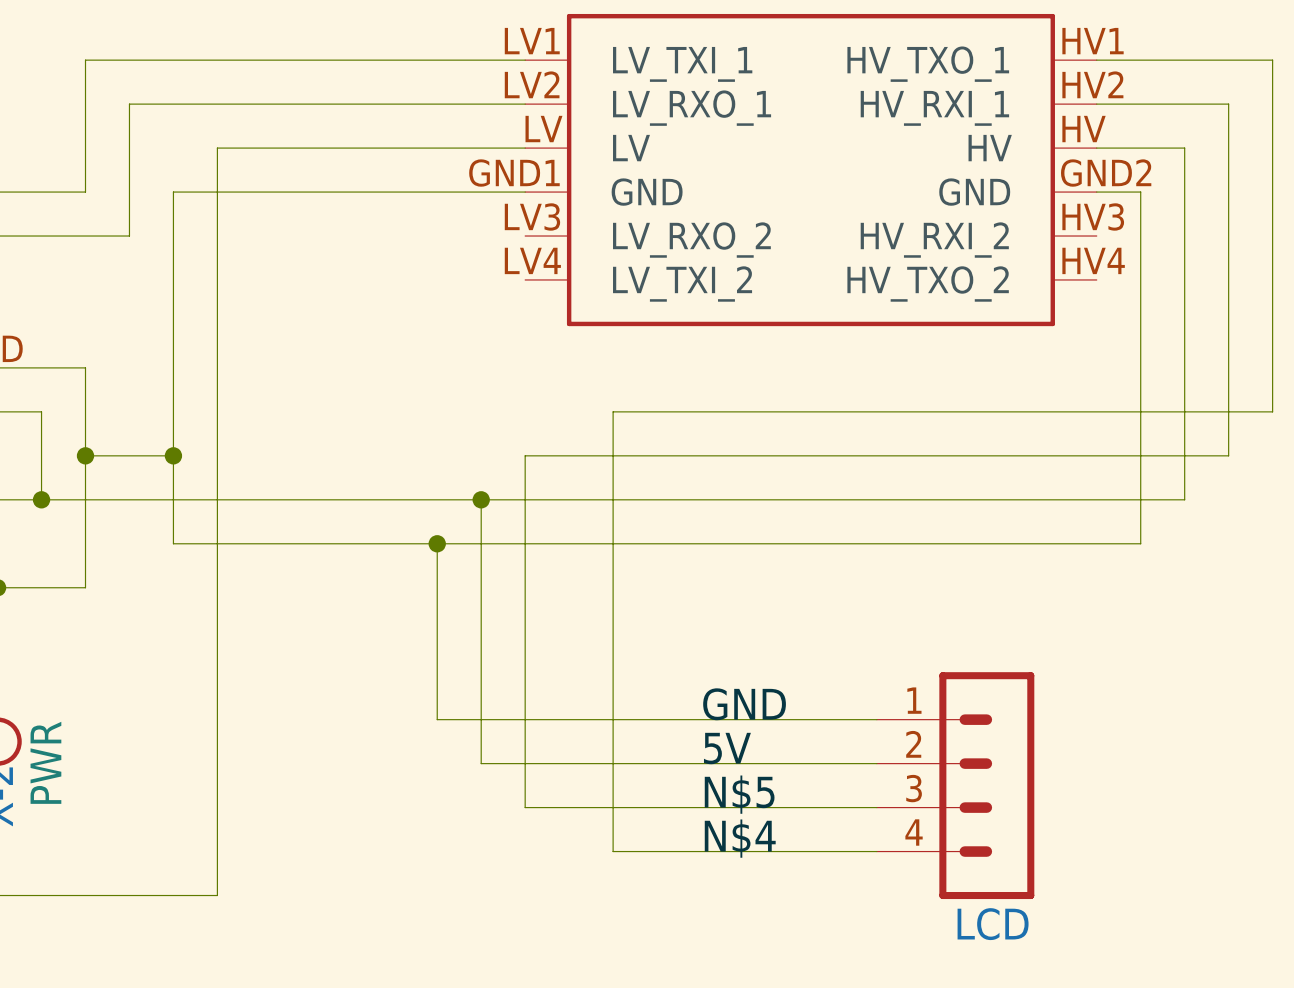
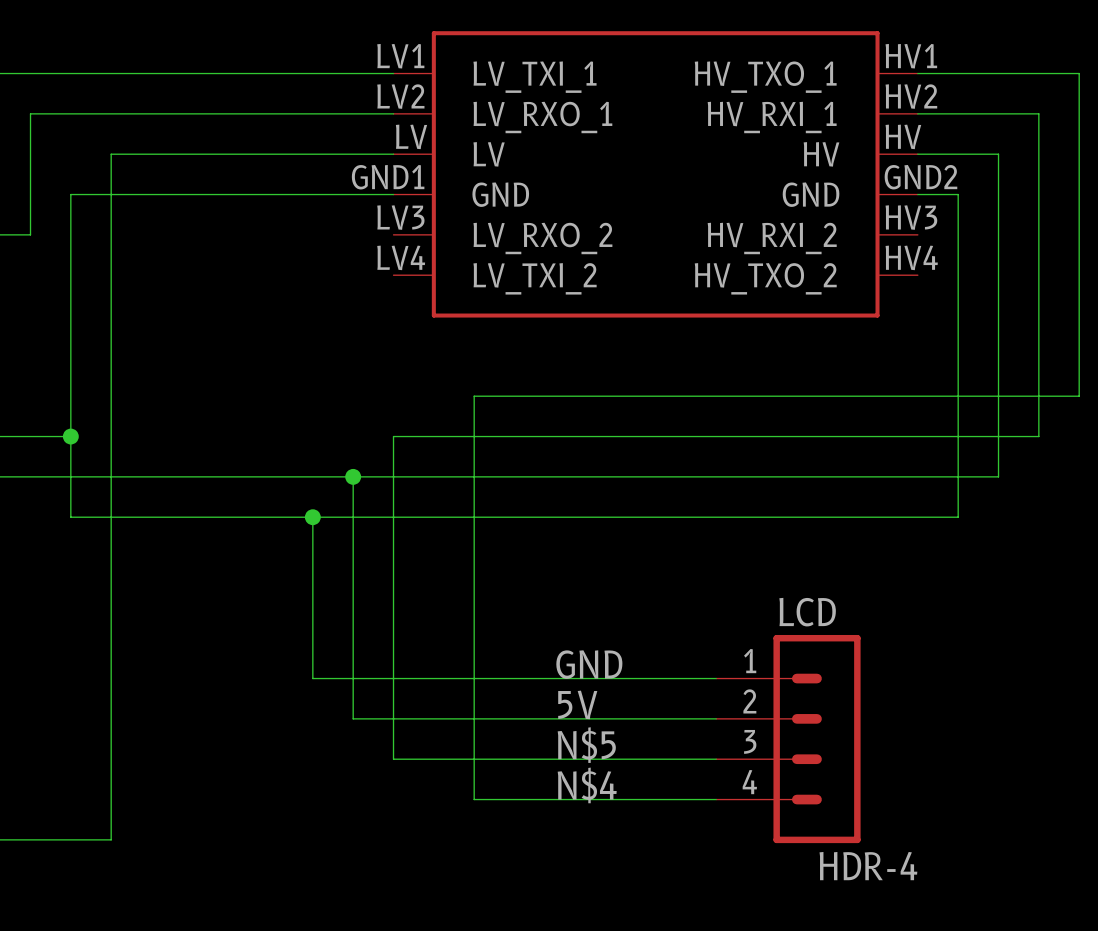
LCD name position: LCD (993, 924) -> LCD (807, 612)
LCD value: none -> HDR-4 (868, 866)

